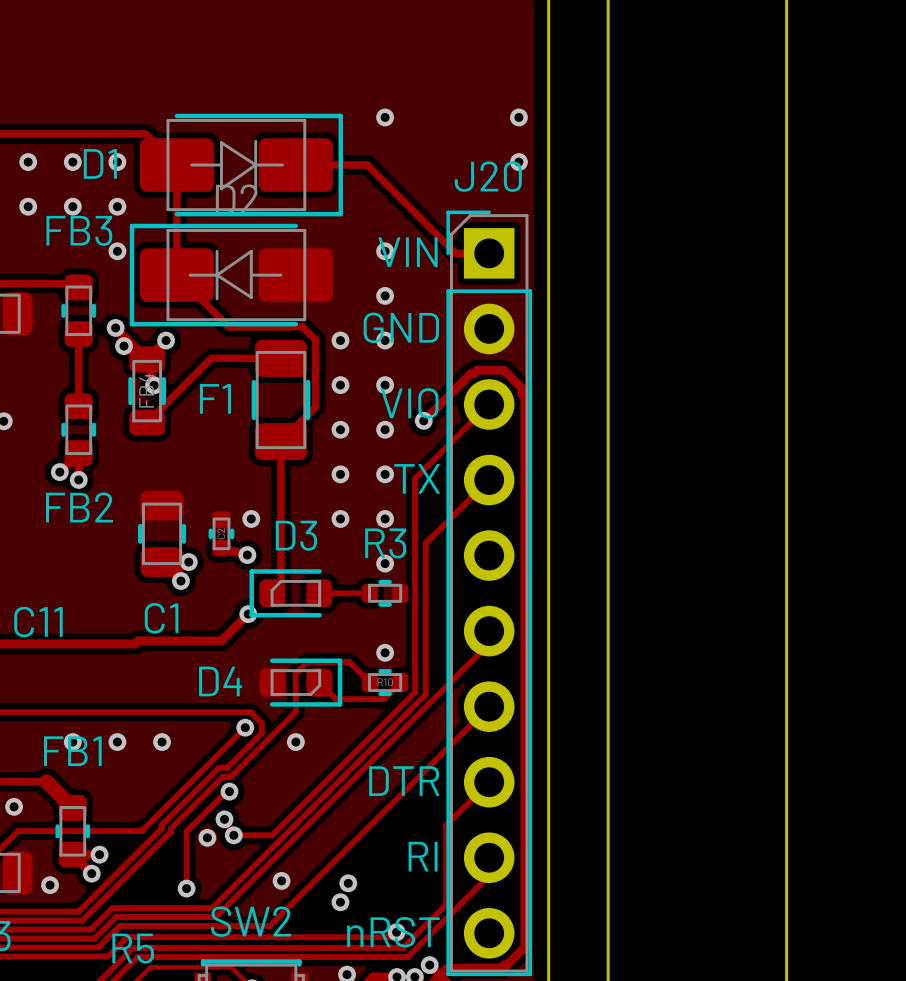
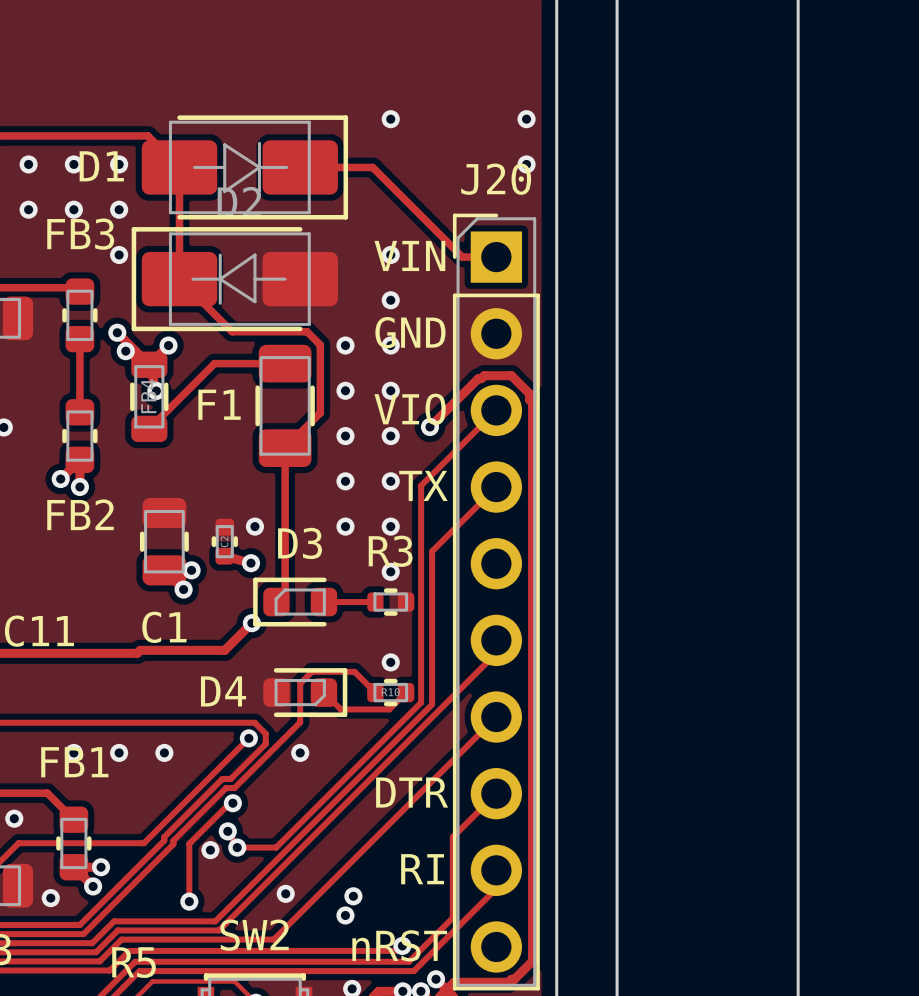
track width: thick (46, 781) (72, 807) -> thin (47, 793) (73, 819)

